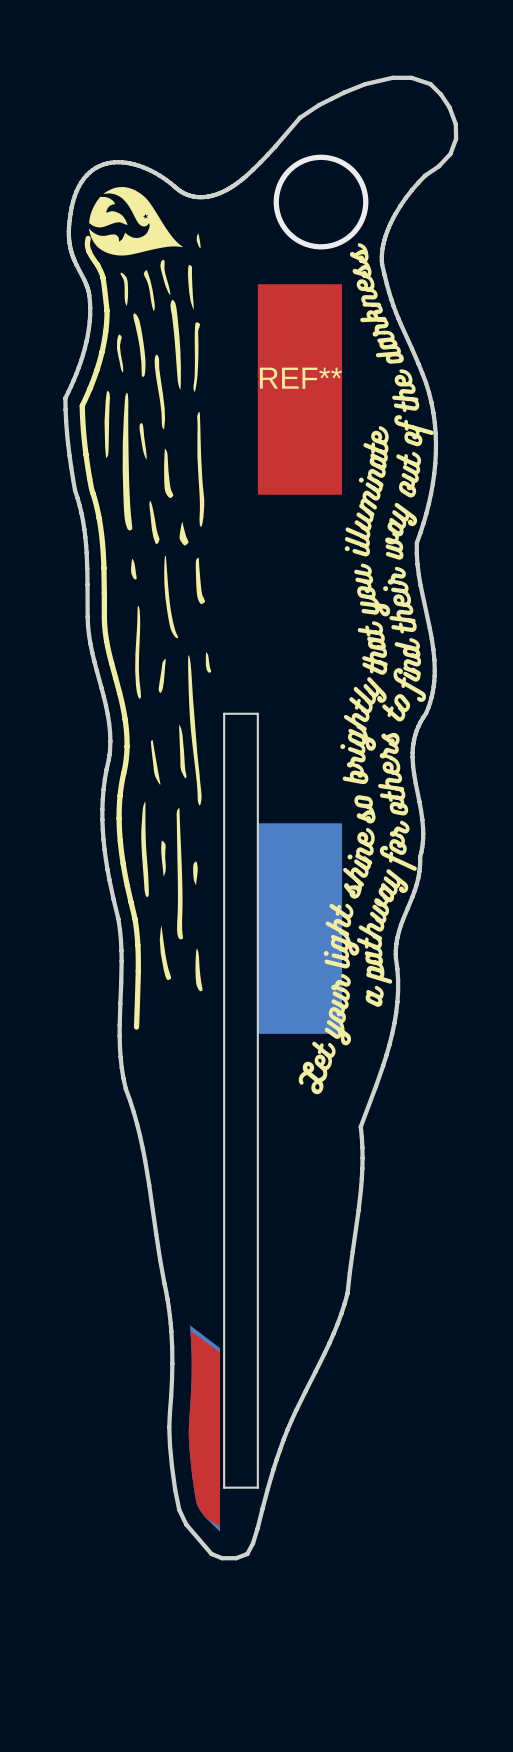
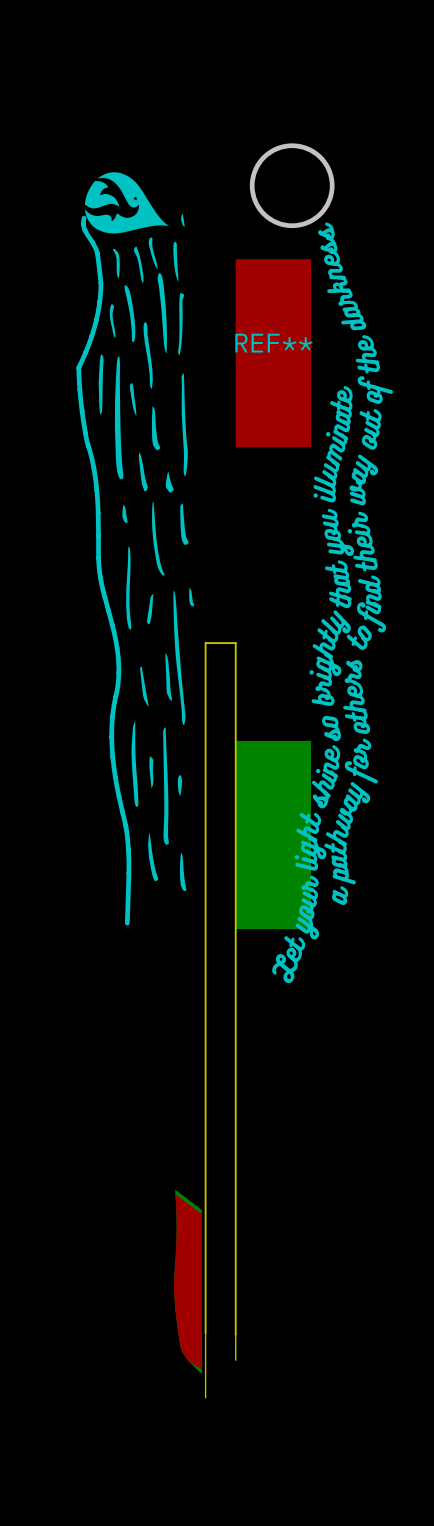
board edge: (392, 77) (365, 84) (318, 105) (299, 117) (246, 176) (229, 188) (214, 194) (200, 197) (188, 195) (155, 172) (134, 164) (114, 162) (99, 166) (86, 175) (78, 186) (73, 201) (69, 220) (70, 248) (87, 289) (90, 314) (83, 354) (65, 398) (66, 421) (73, 478) (85, 537) (89, 634) (105, 705) (110, 732) (110, 750) (103, 789) (102, 819) (105, 859) (120, 940) (119, 1035) (121, 1067) (142, 1148) (168, 1307) (172, 1363) (169, 1445) (179, 1509) (186, 1524) (211, 1554) (222, 1558) (236, 1558) (247, 1554) (253, 1543) (283, 1439) (329, 1343) (344, 1303) (360, 1189) (362, 1158) (360, 1126) (383, 1065) (392, 1034) (398, 991) (396, 940) (416, 884) (422, 842) (422, 819) (414, 774) (412, 748) (416, 730) (430, 702) (434, 670) (431, 638) (418, 574) (416, 542) (426, 513) (432, 483) (435, 433) (429, 392) (393, 306) (384, 274) (381, 256) (387, 231) (400, 206) (425, 175) (438, 166) (450, 154) (456, 138) (455, 124) (449, 107) (430, 84) (411, 77) (392, 77) -> none
board edge: (224, 1486) (257, 1487) -> (235, 1360) (235, 1334)
board edge: none -> (205, 1334) (205, 1397)

